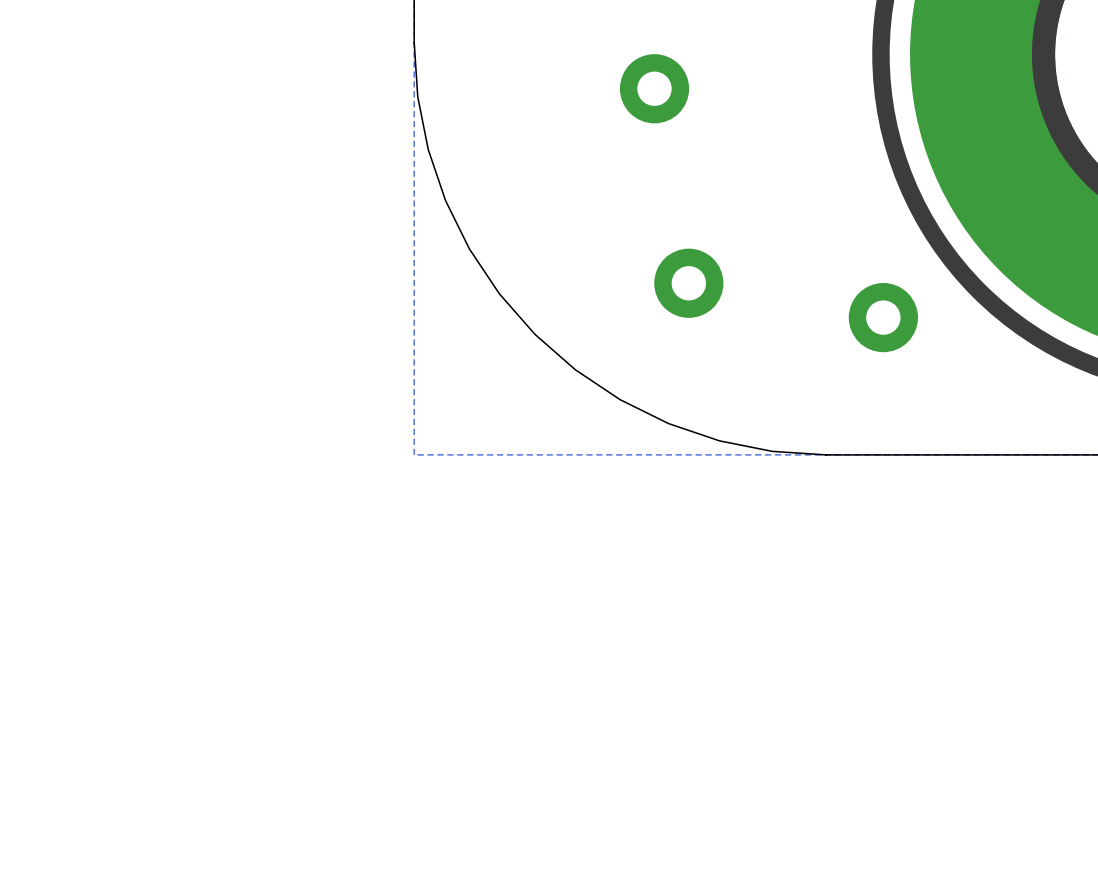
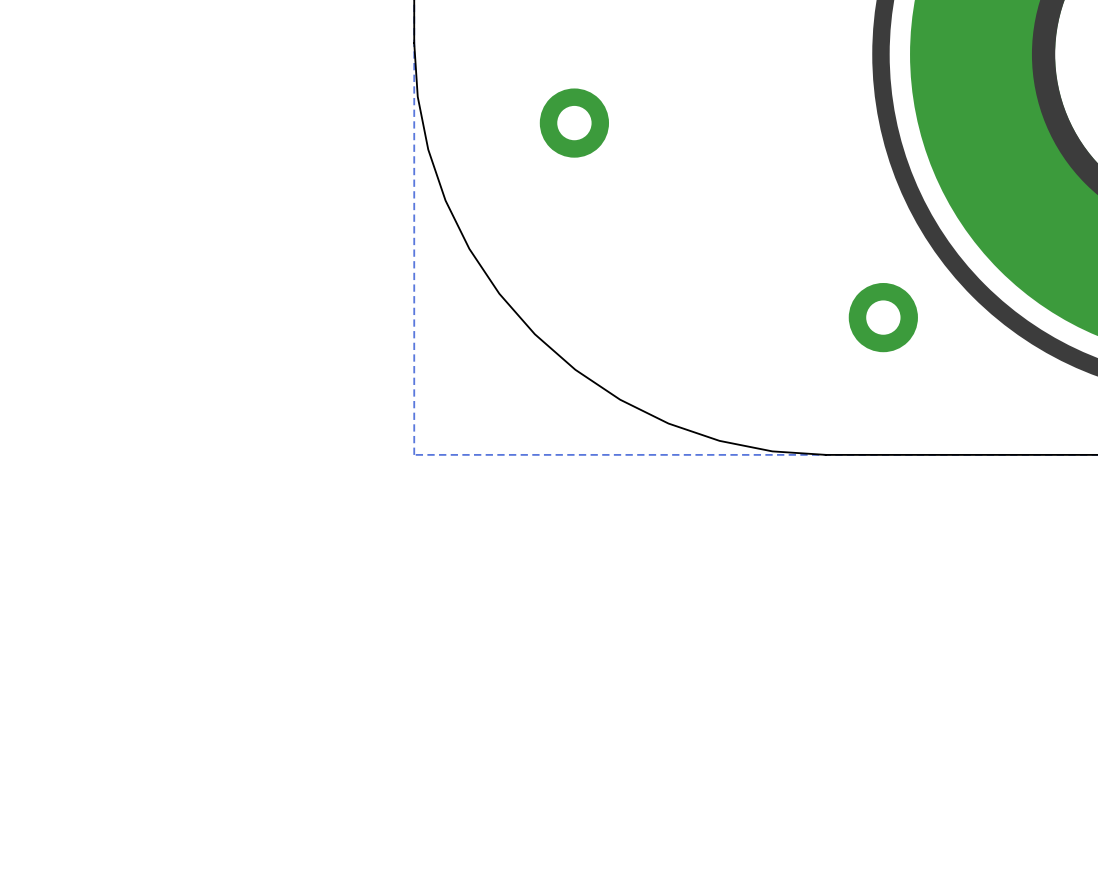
via position: (654, 88) -> (574, 123)
via: (688, 283) -> none

